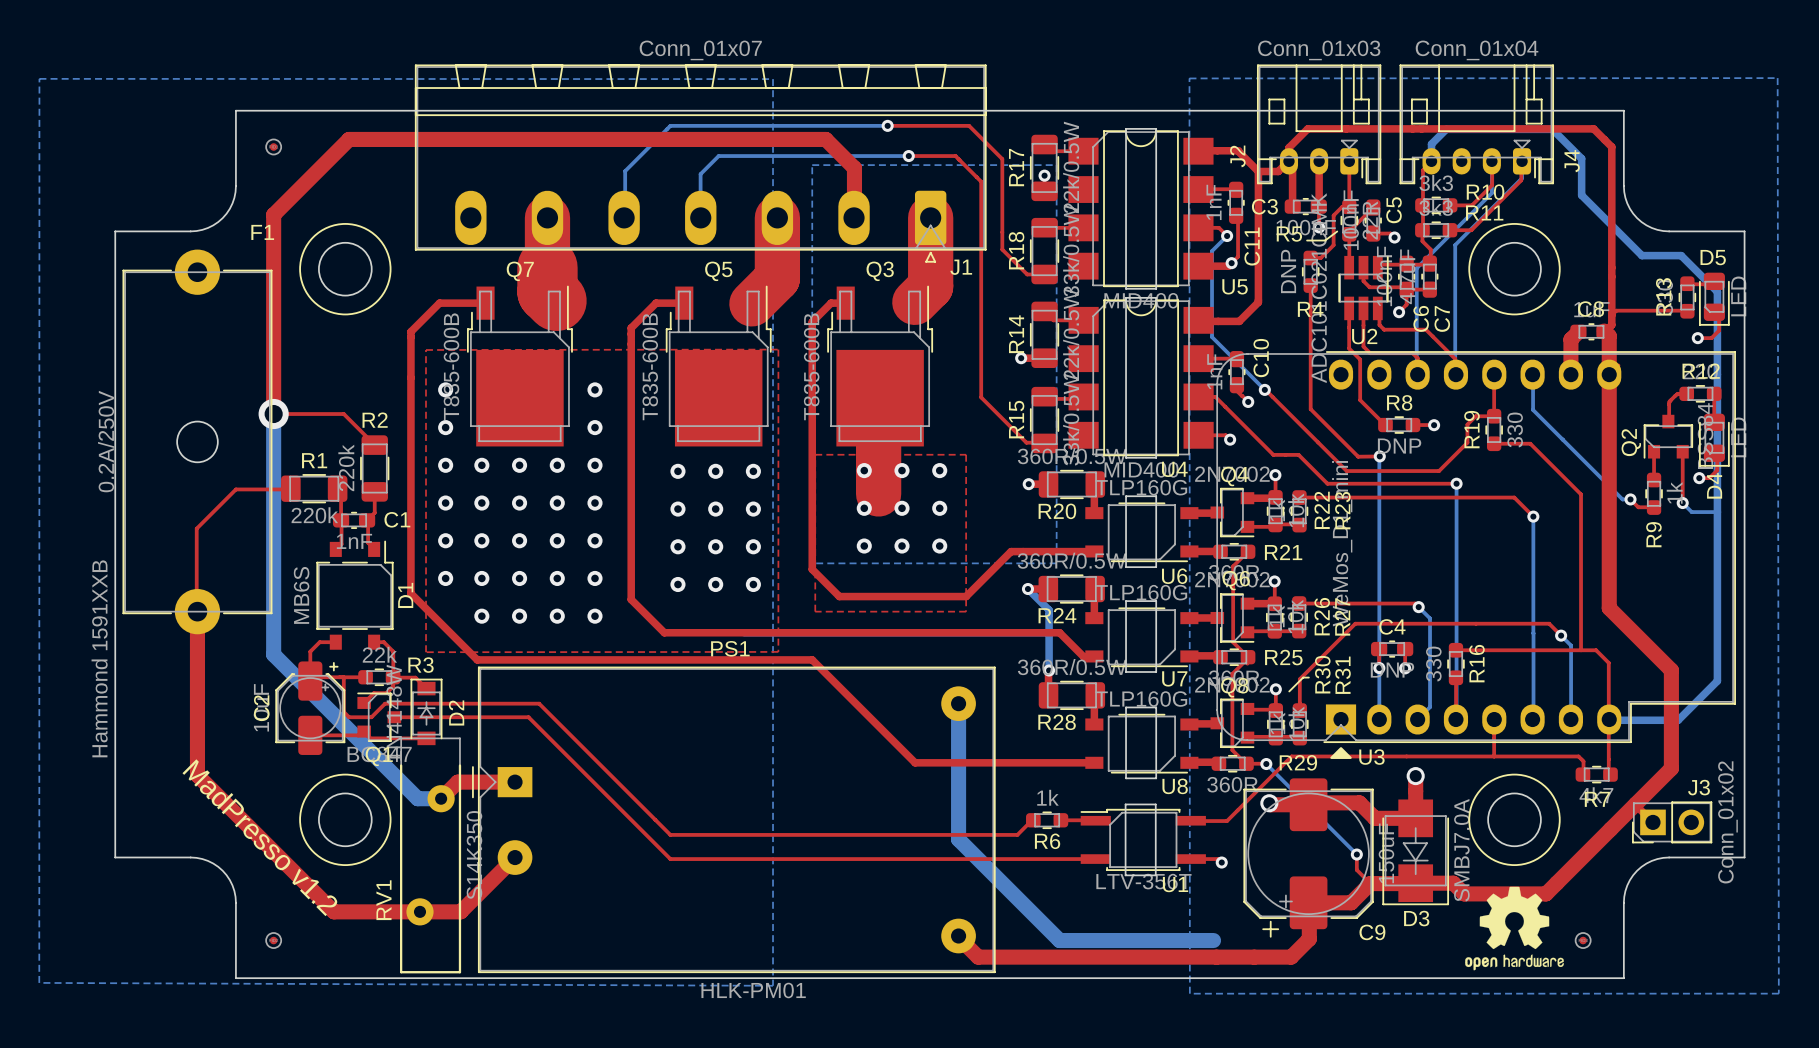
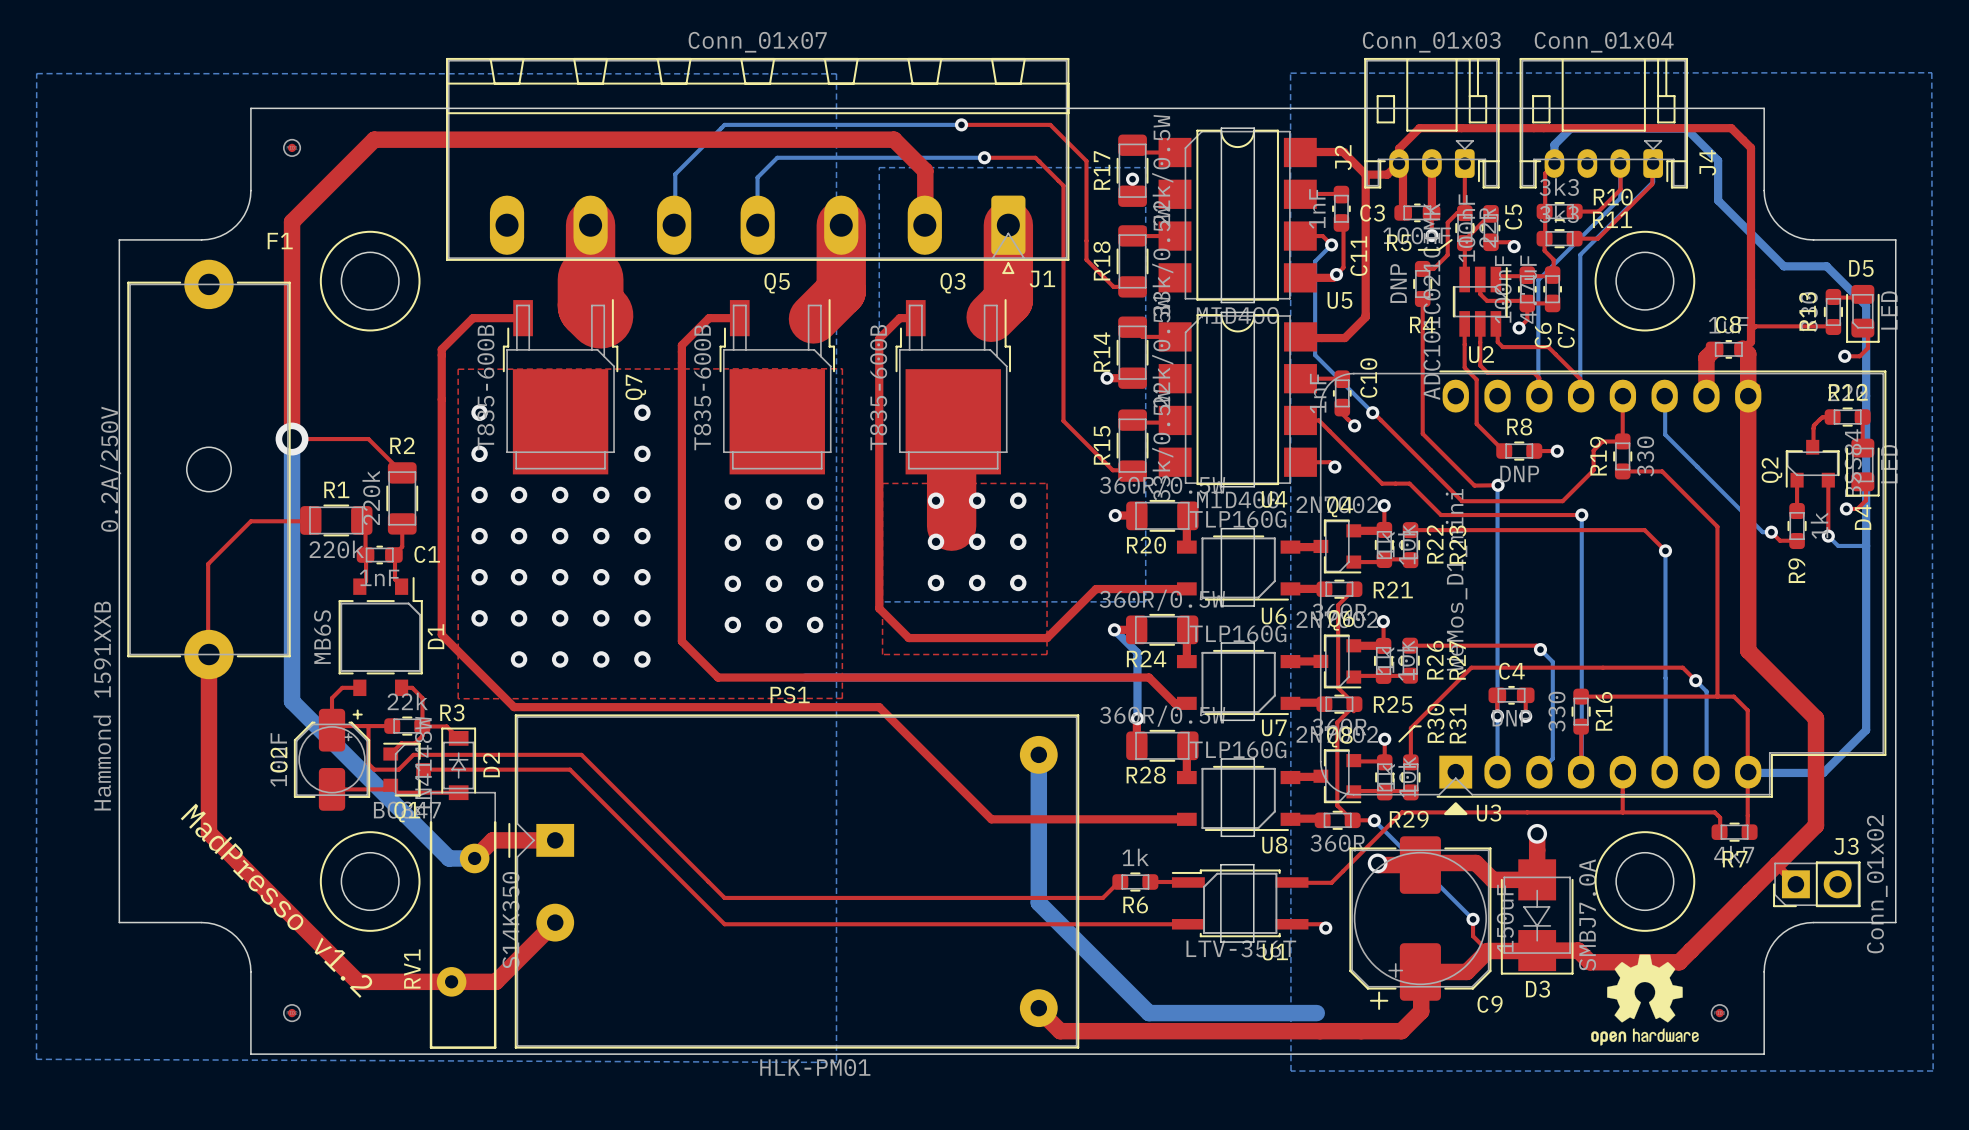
Q7 name rotation: 0° (520, 271) -> 90° counterclockwise (635, 387)
Q7 name position: Q7 (520, 271) -> Q7 (635, 387)

